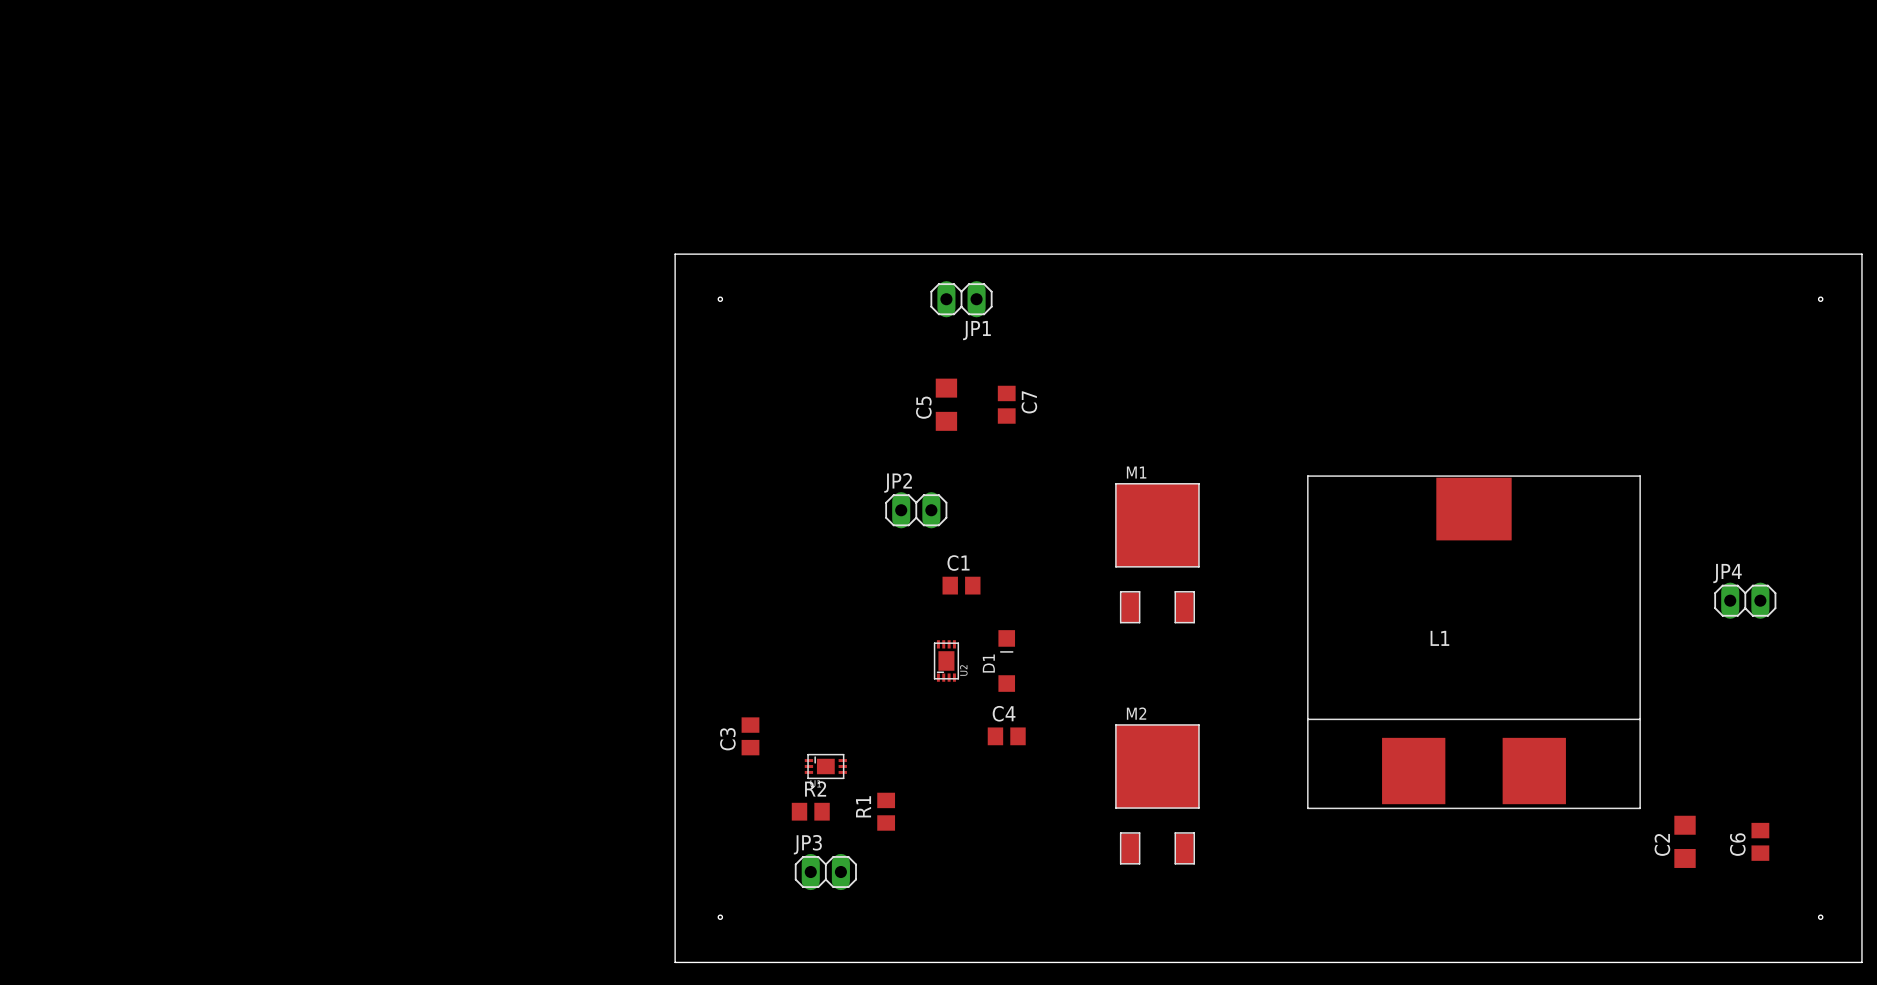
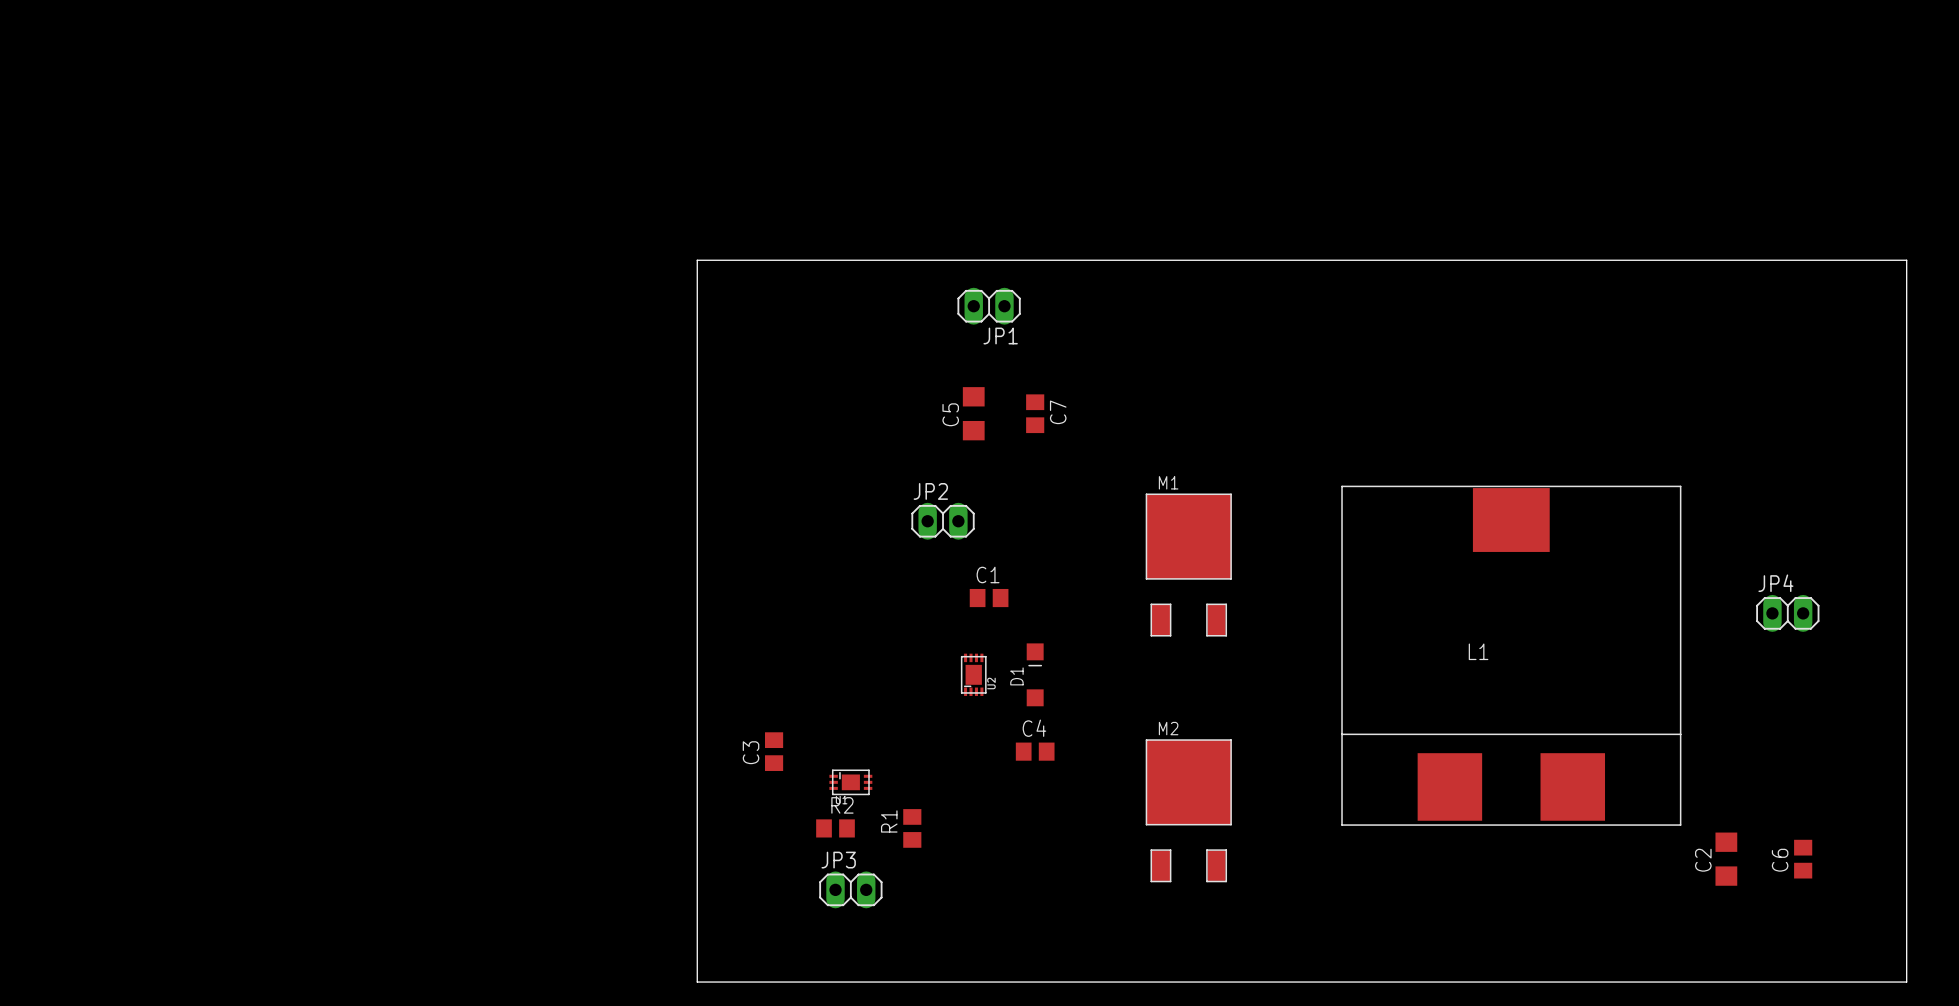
hole: (720, 299) -> none
hole: (1820, 299) -> none
hole: (720, 917) -> none
hole: (1820, 917) -> none

